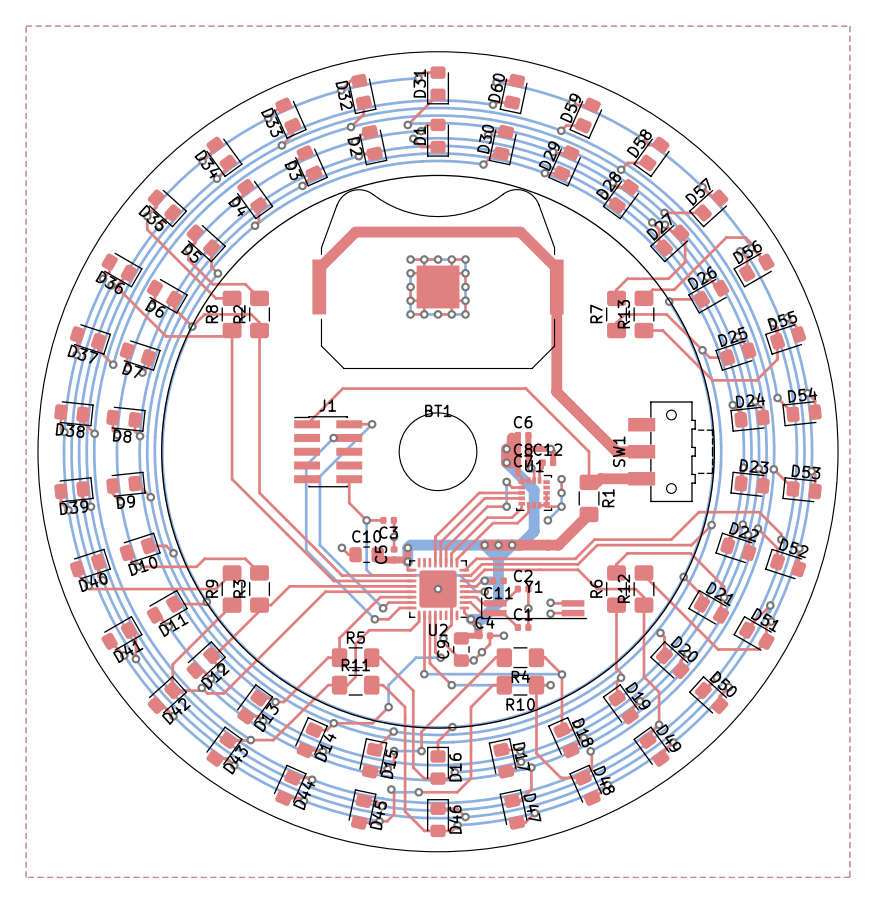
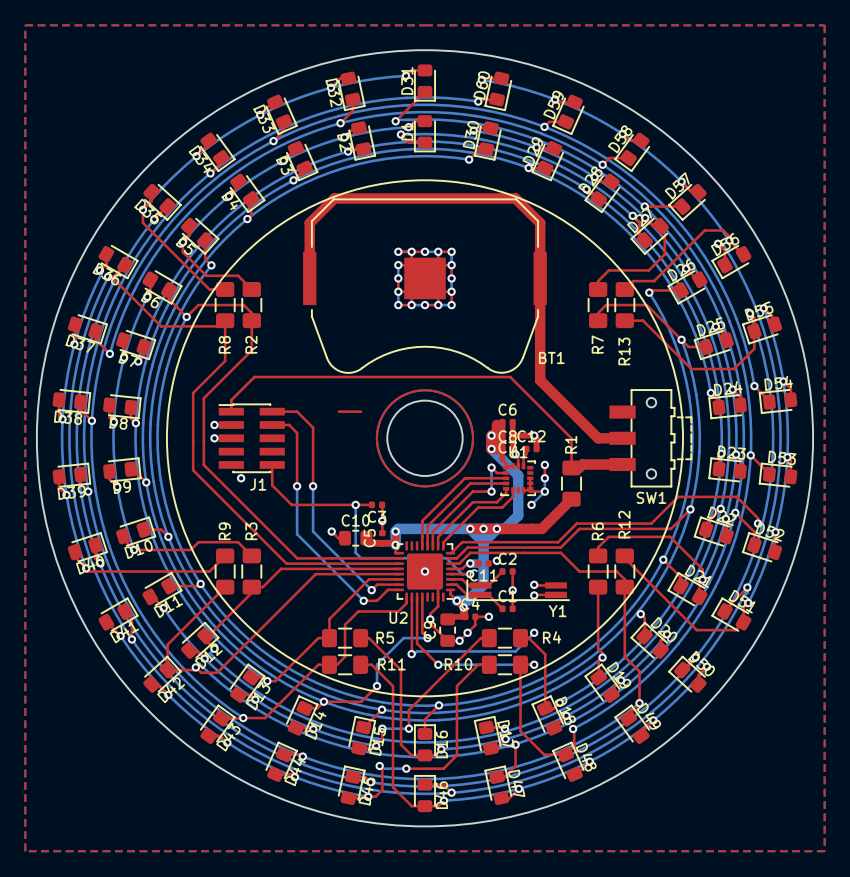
drawing: [161, 174, 715, 729] -> none
drawing: none -> [166, 179, 684, 697]
top track: (319, 268) (355, 232) (520, 232) (556, 268) -> (309, 260) (309, 223) (334, 198) (515, 198) (540, 223) (540, 260)
BT1 rotation: 0° (438, 279) -> 180° (424, 286)
R7 name position: R7 (596, 313) -> R7 (597, 344)
R8 name position: R8 (211, 314) -> R8 (224, 344)
R2 name position: R2 (239, 314) -> R2 (251, 344)
R13 name position: R13 (623, 314) -> R13 (624, 351)
top track: (259, 361) (259, 492) (342, 575) -> (251, 350) (203, 398) (203, 464) (297, 558) (331, 558)
top track: (232, 372) (232, 479) (333, 580) -> (225, 361) (193, 393) (193, 470) (286, 563) (323, 563)
top track: (342, 388) (307, 424) -> (332, 377) (254, 377) (231, 400) (231, 411)
J1 name position: J1 (327, 405) -> J1 (258, 484)
BT1 name position: BT1 (438, 410) -> BT1 (551, 357)
top track: none -> (272, 411) (297, 411) (313, 427) (313, 486)
bottom track: (372, 424) (319, 476) (319, 545) (322, 547) -> (313, 486) (313, 531)
via: (372, 424) -> none
via: none -> (214, 424)
top track: none -> (272, 424) (289, 424) (297, 432) (297, 486)
bottom track: (333, 438) (306, 465) (306, 501) -> none
via: (333, 438) -> none
via: none -> (214, 438)
J1 position: (328, 451) -> (251, 438)
SW1 name rotation: 0° (619, 451) -> 90° clockwise (651, 497)
SW1 name position: SW1 (619, 451) -> SW1 (651, 497)
top track: (349, 479) (349, 503) (366, 520) -> (272, 464) (272, 485) (291, 504) (355, 504)
via: none -> (241, 478)
R1 name position: R1 (608, 498) -> R1 (571, 444)
via: none -> (297, 486)
via: none -> (313, 486)
via: none -> (496, 560)
Y1 name position: Y1 (533, 586) -> Y1 (557, 611)
R9 name position: R9 (211, 588) -> R9 (224, 531)
R3 name position: R3 (239, 588) -> R3 (251, 531)
R6 name position: R6 (596, 588) -> R6 (597, 531)
R12 name position: R12 (623, 588) -> R12 (624, 524)
U2 name position: U2 (438, 629) -> U2 (398, 617)
R5 name position: R5 (355, 637) -> R5 (385, 637)
R11 name position: R11 (355, 665) -> R11 (391, 664)
bottom track: (427, 674) (561, 674) -> (414, 654) (416, 651) (515, 651) (534, 632)
via position: (561, 674) -> (534, 632)
R4 name position: R4 (520, 676) -> R4 (552, 637)
R10 name position: R10 (520, 704) -> R10 (458, 664)

